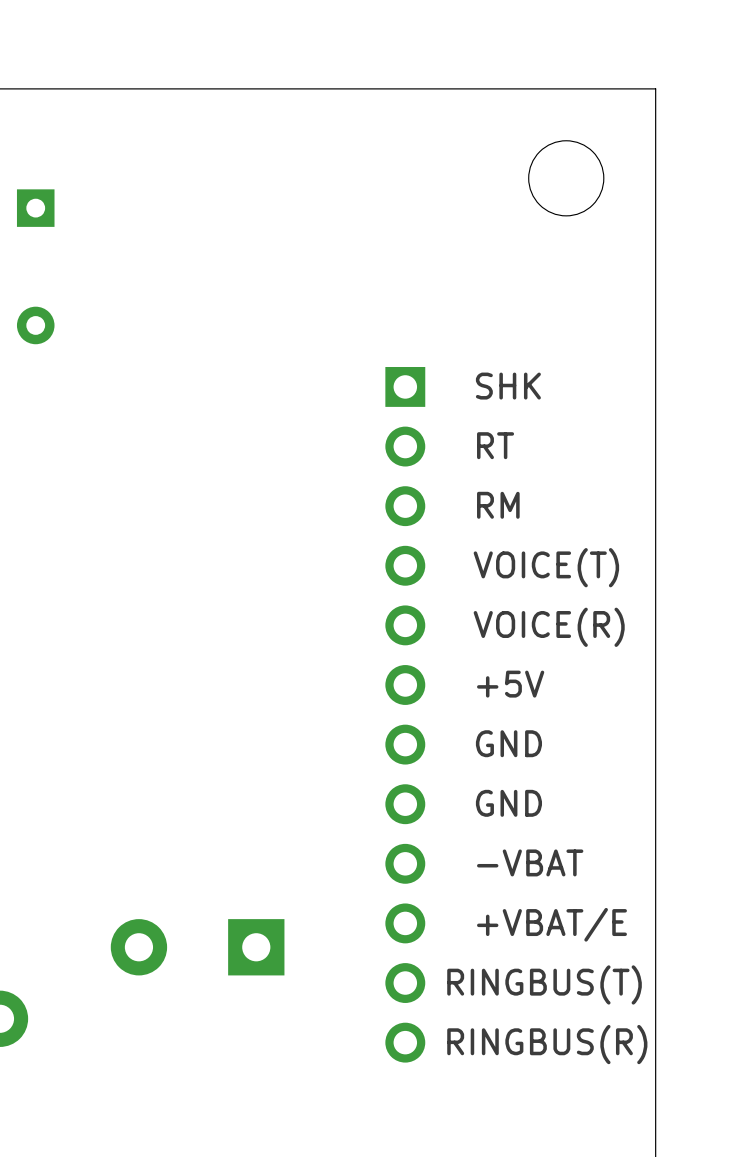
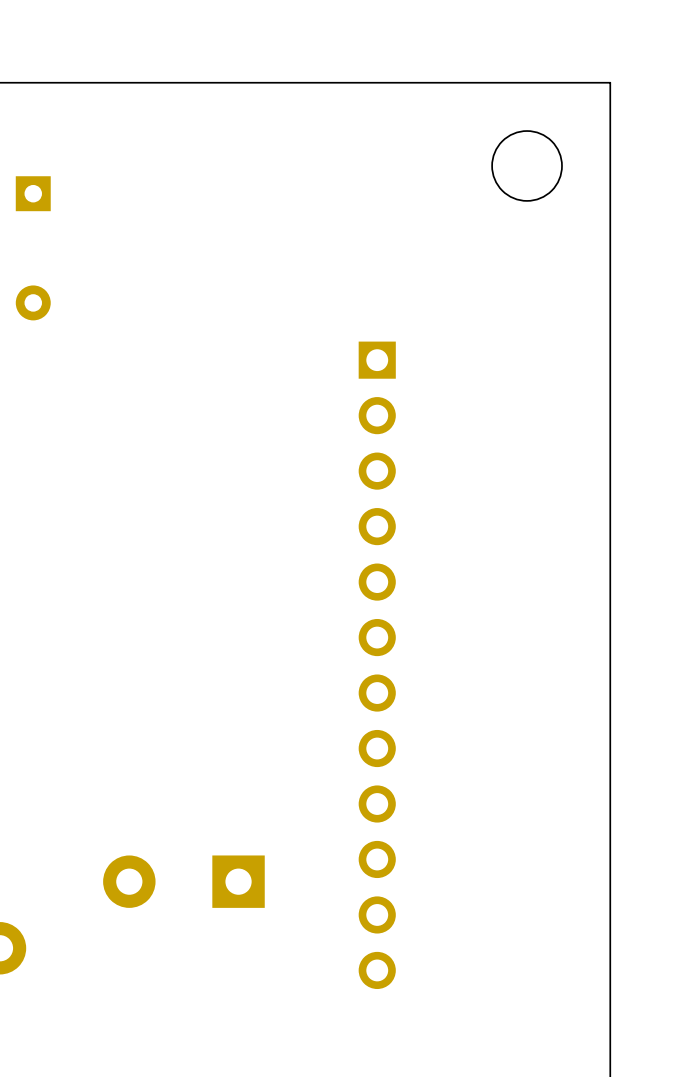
text: SHK (508, 386) -> none
text: RT (495, 445) -> none
text: RM (498, 505) -> none
text: VOICE(T) (546, 567) -> none
text: VOICE(R) (549, 627) -> none
text: +5V (510, 684) -> none
text: GND (508, 743) -> none
text: GND (508, 803) -> none
text: -VBAT (530, 862) -> none
text: +VBAT/E (551, 924) -> none
text: RINGBUS(T) (544, 984) -> none
text: RINGBUS(R) (547, 1044) -> none

